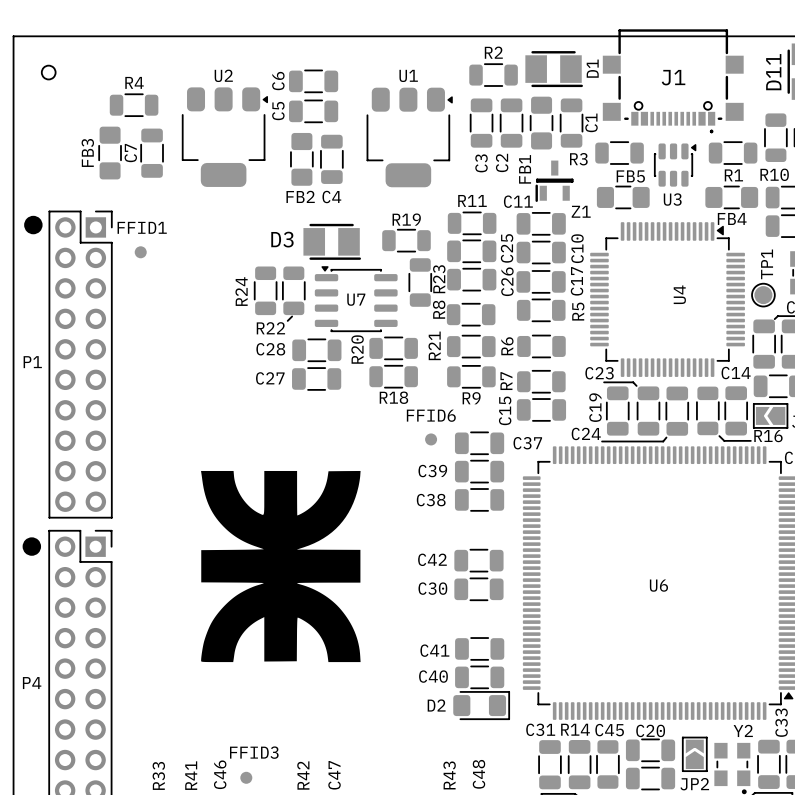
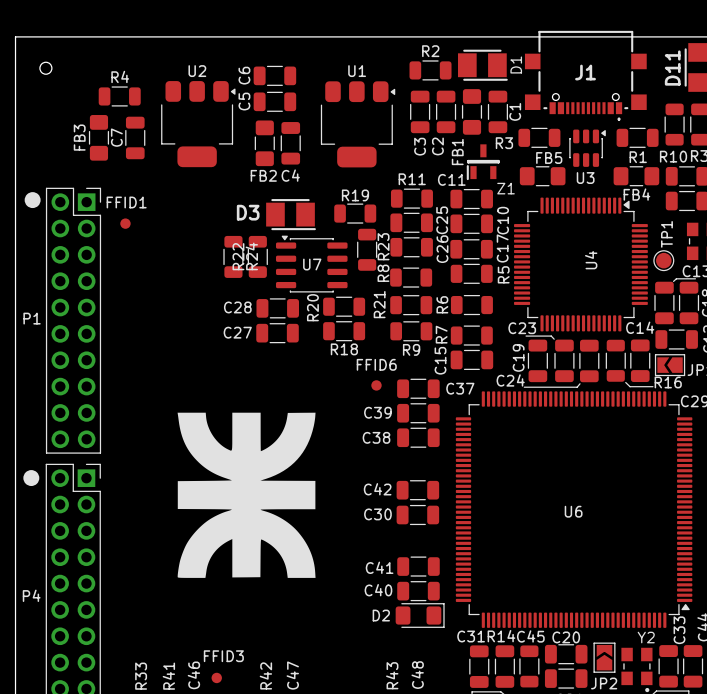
R24 name position: R24 (241, 291) -> R24 (251, 256)
line: (292, 316) (287, 320) -> none
R22 name rotation: 0° (270, 328) -> 90° counterclockwise (238, 256)

